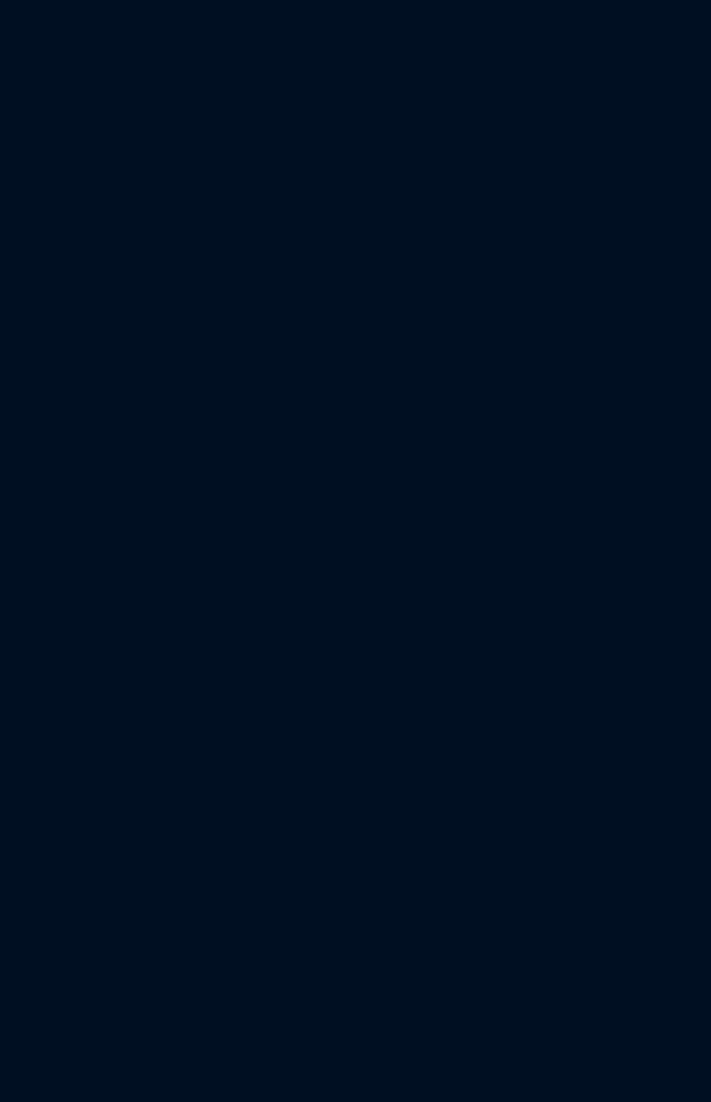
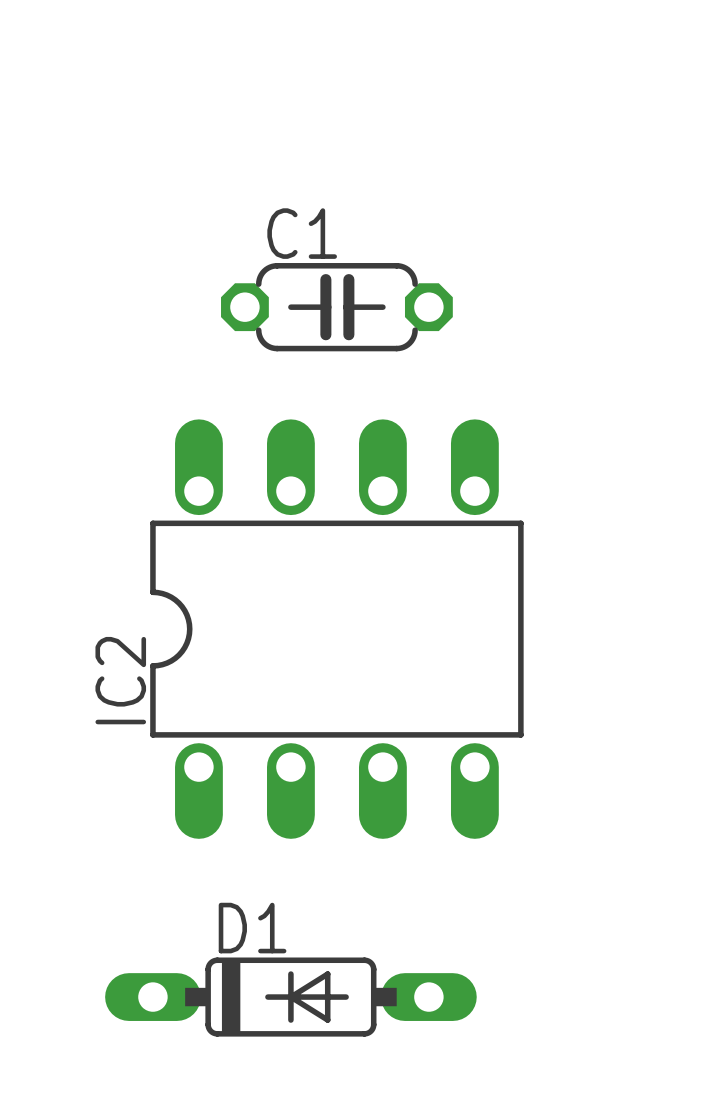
C1: none -> (336, 307)
IC2: none -> (336, 629)
D1: none -> (290, 997)

